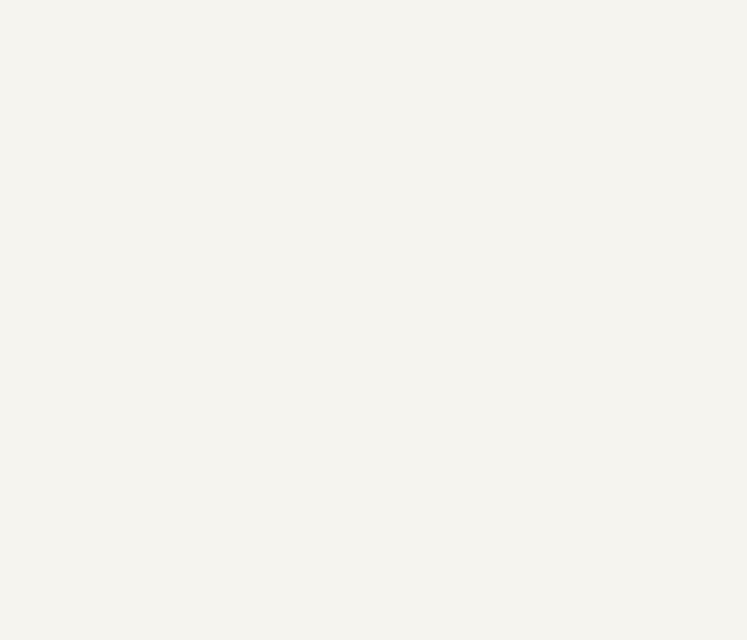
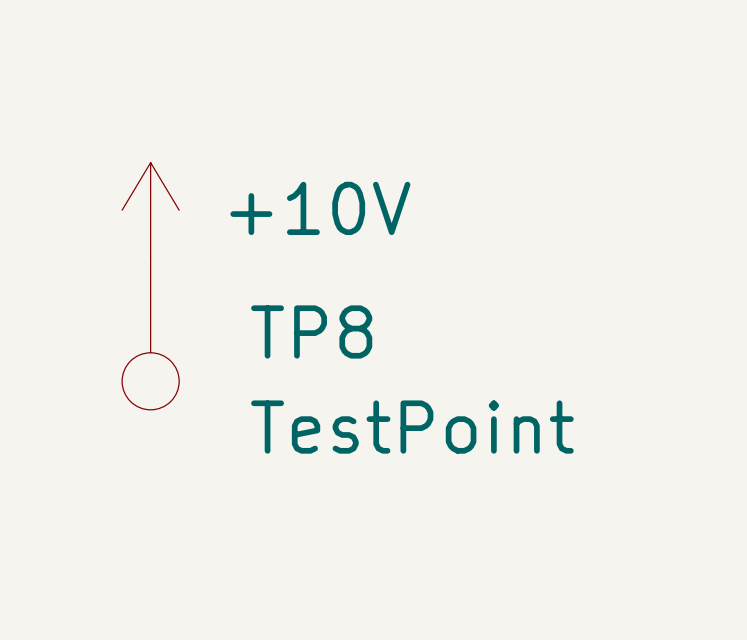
power symbol: none -> +10V (150, 210)
TP8: none -> TestPoint (150, 333)

